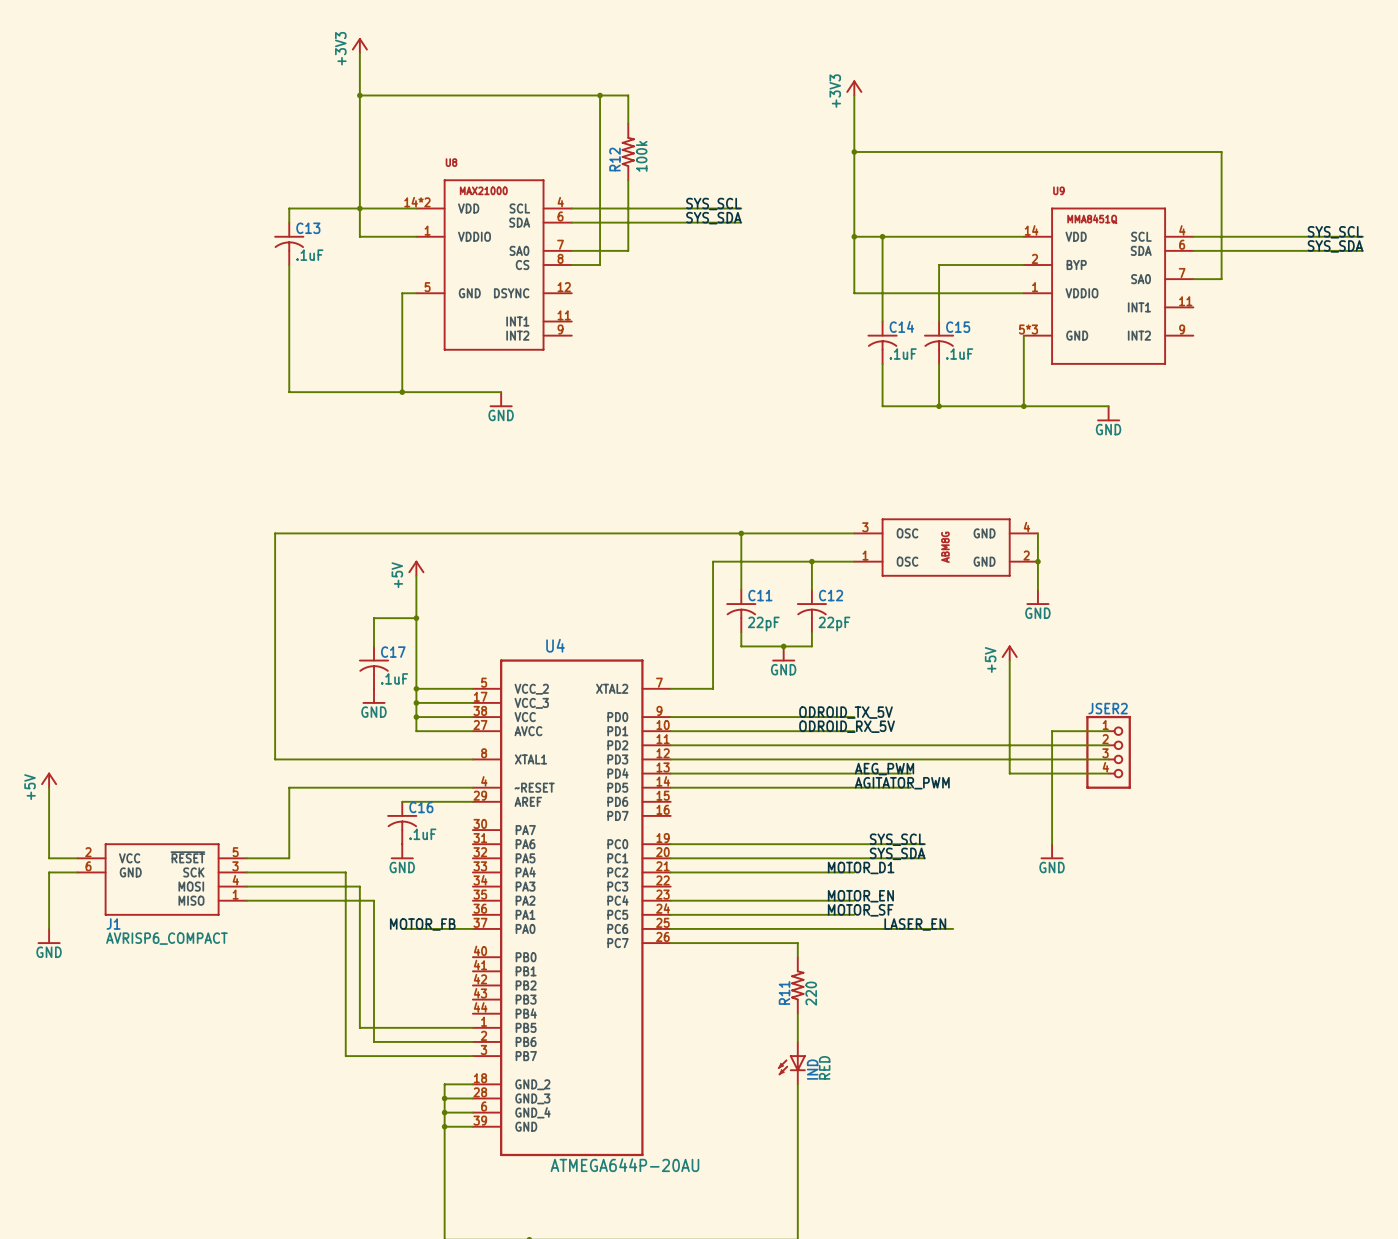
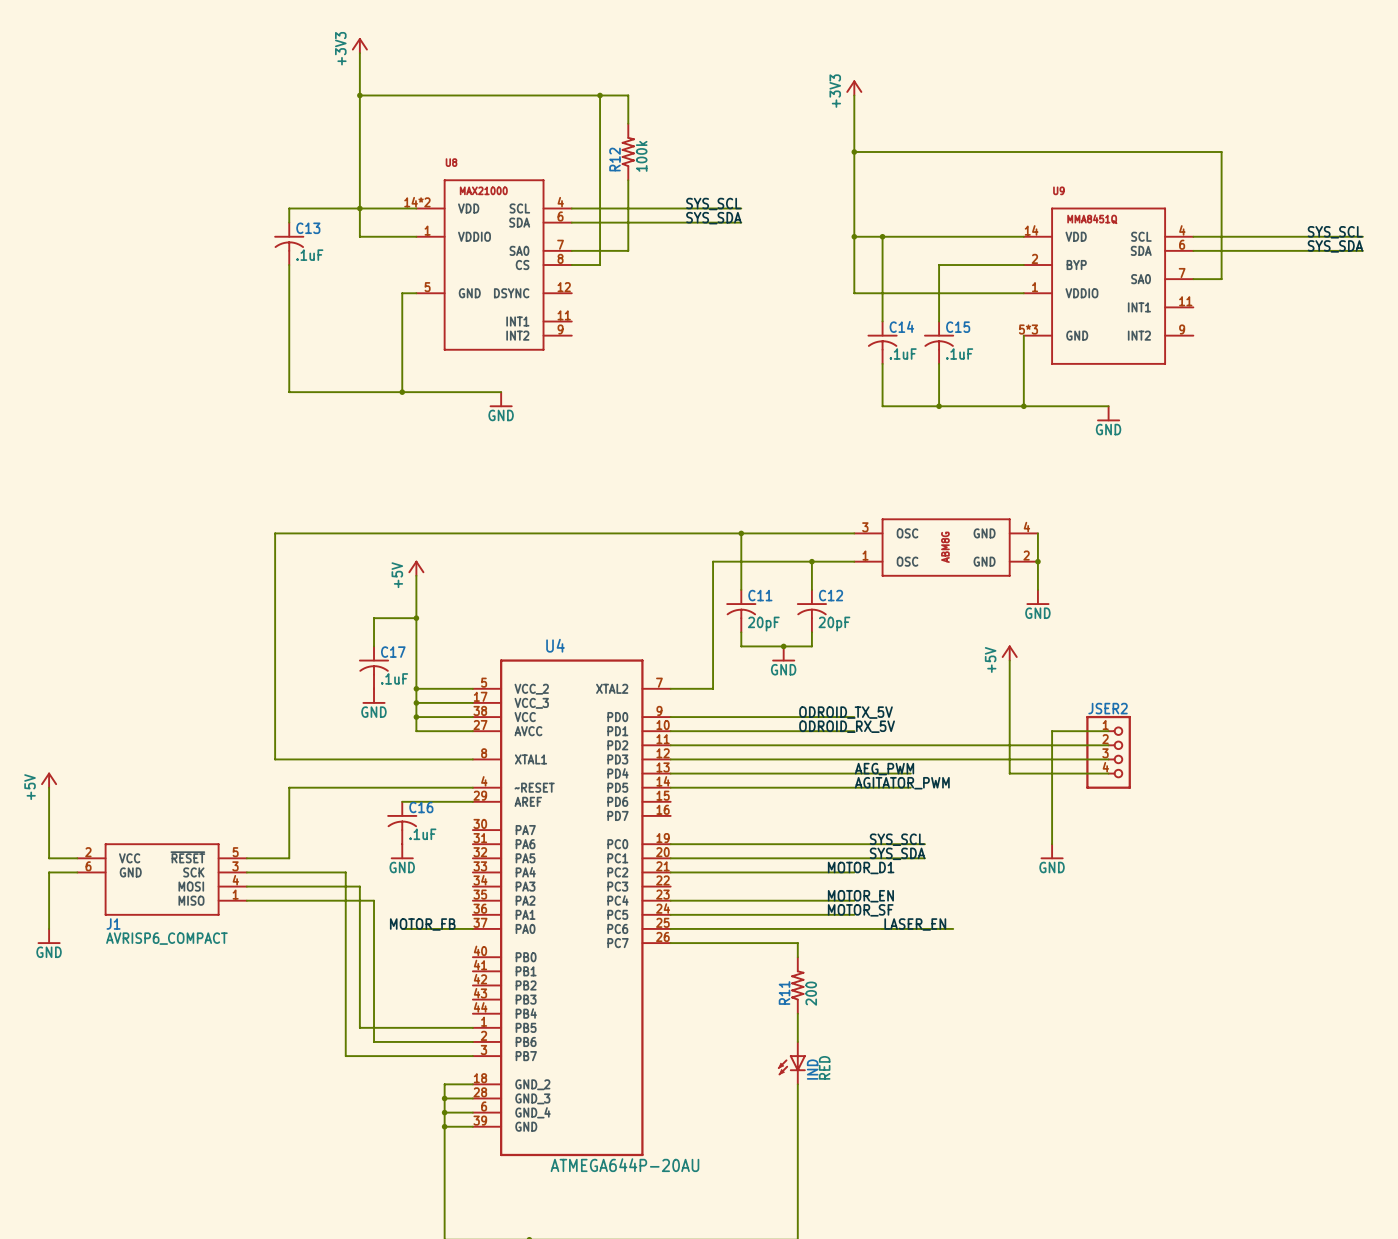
C11 value: 22pF (763, 624) -> 20pF (763, 624)
C12 value: 22pF (834, 624) -> 20pF (834, 624)
R11 value: 220 (811, 993) -> 200 (811, 993)

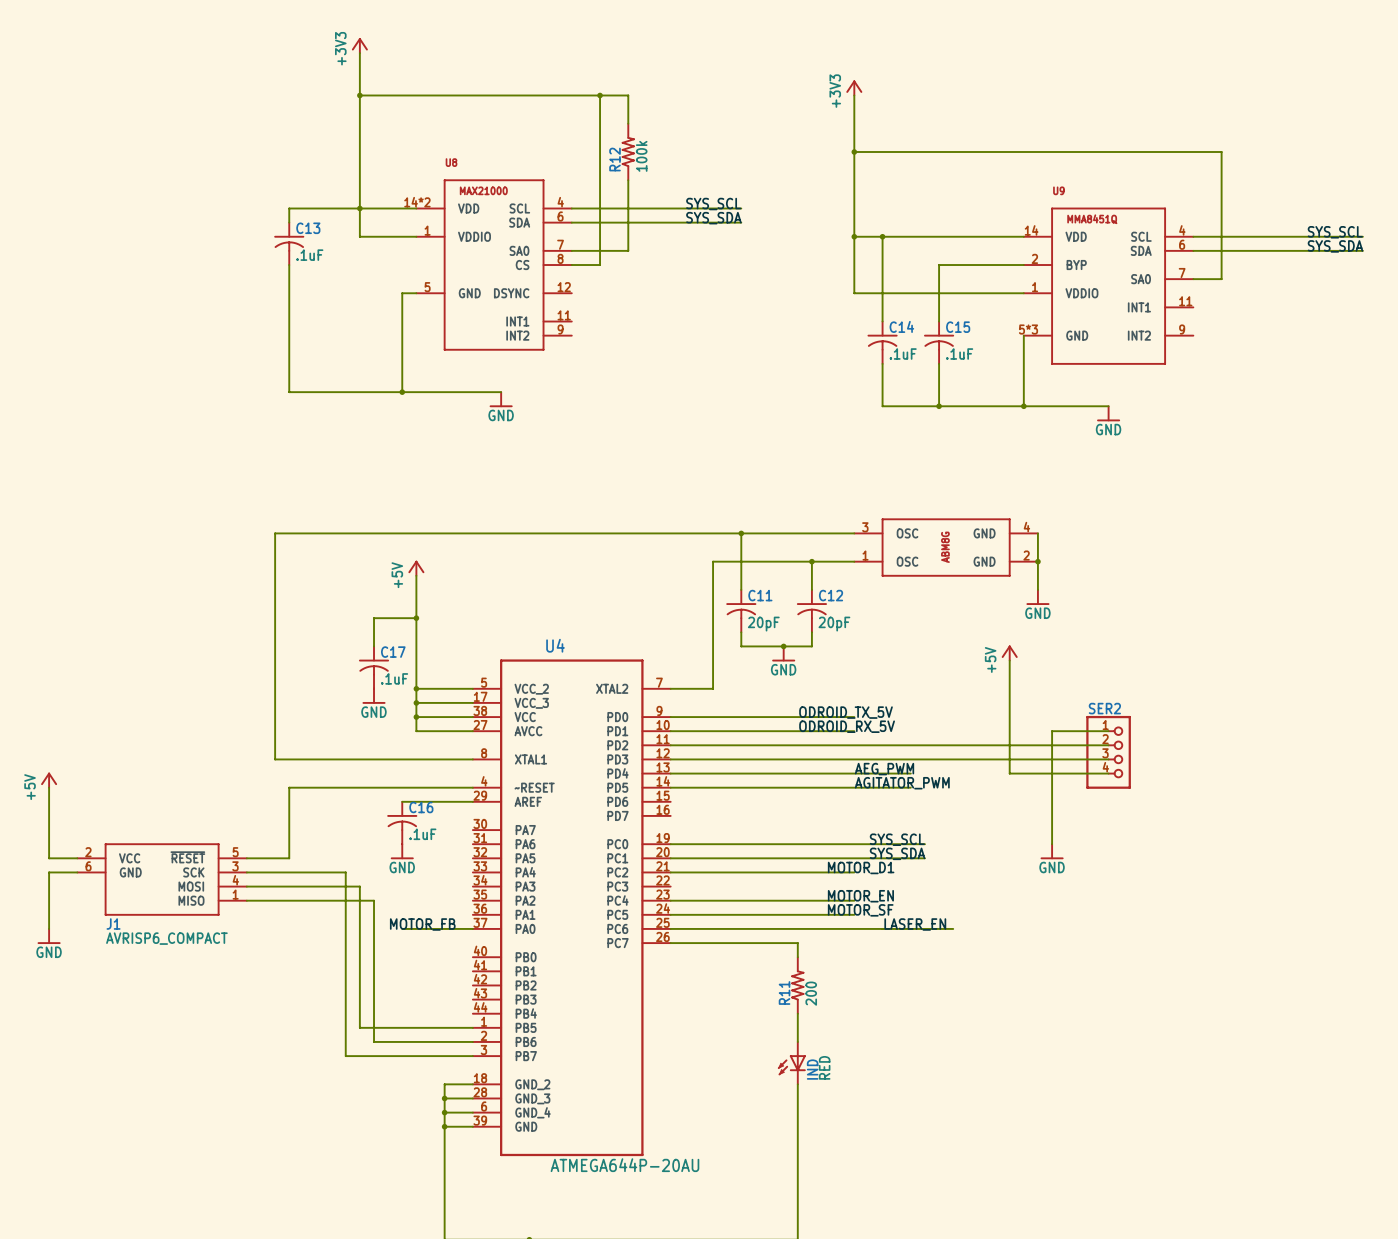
JSER2 name: JSER2 (1108, 708) -> SER2 (1104, 708)

